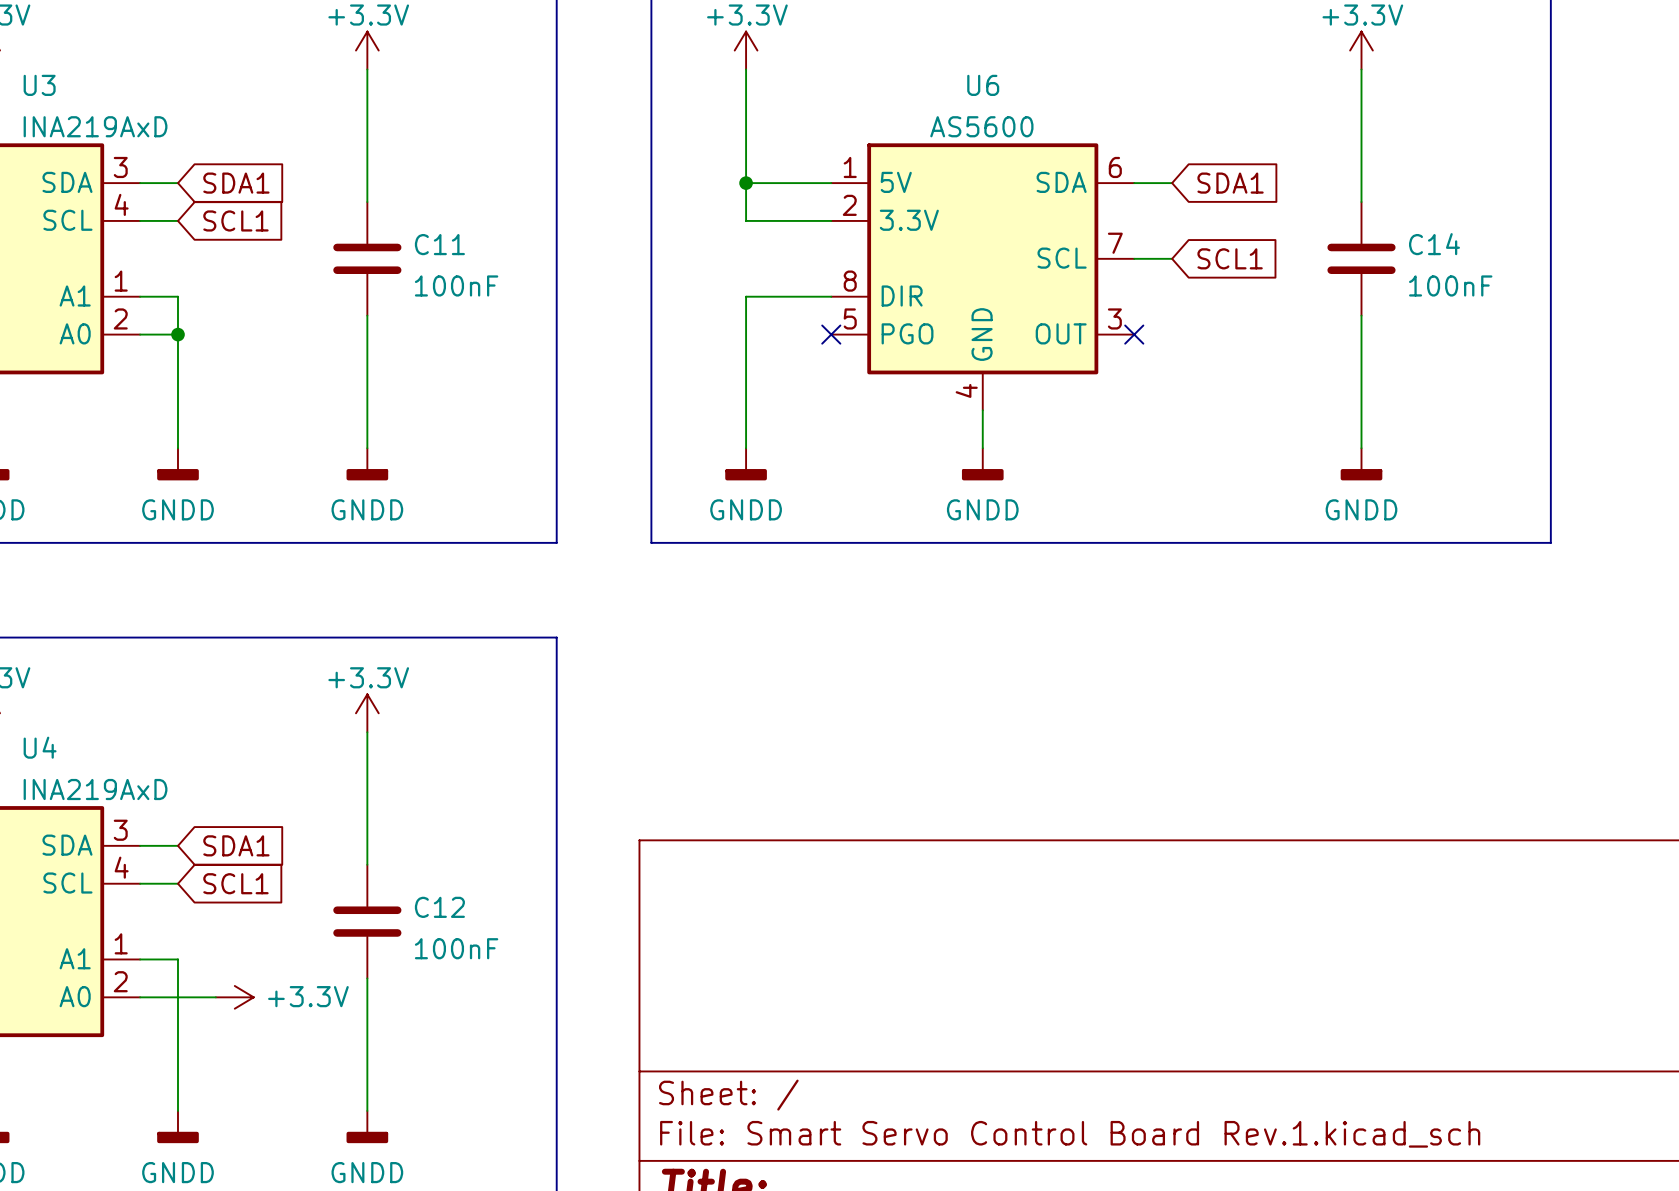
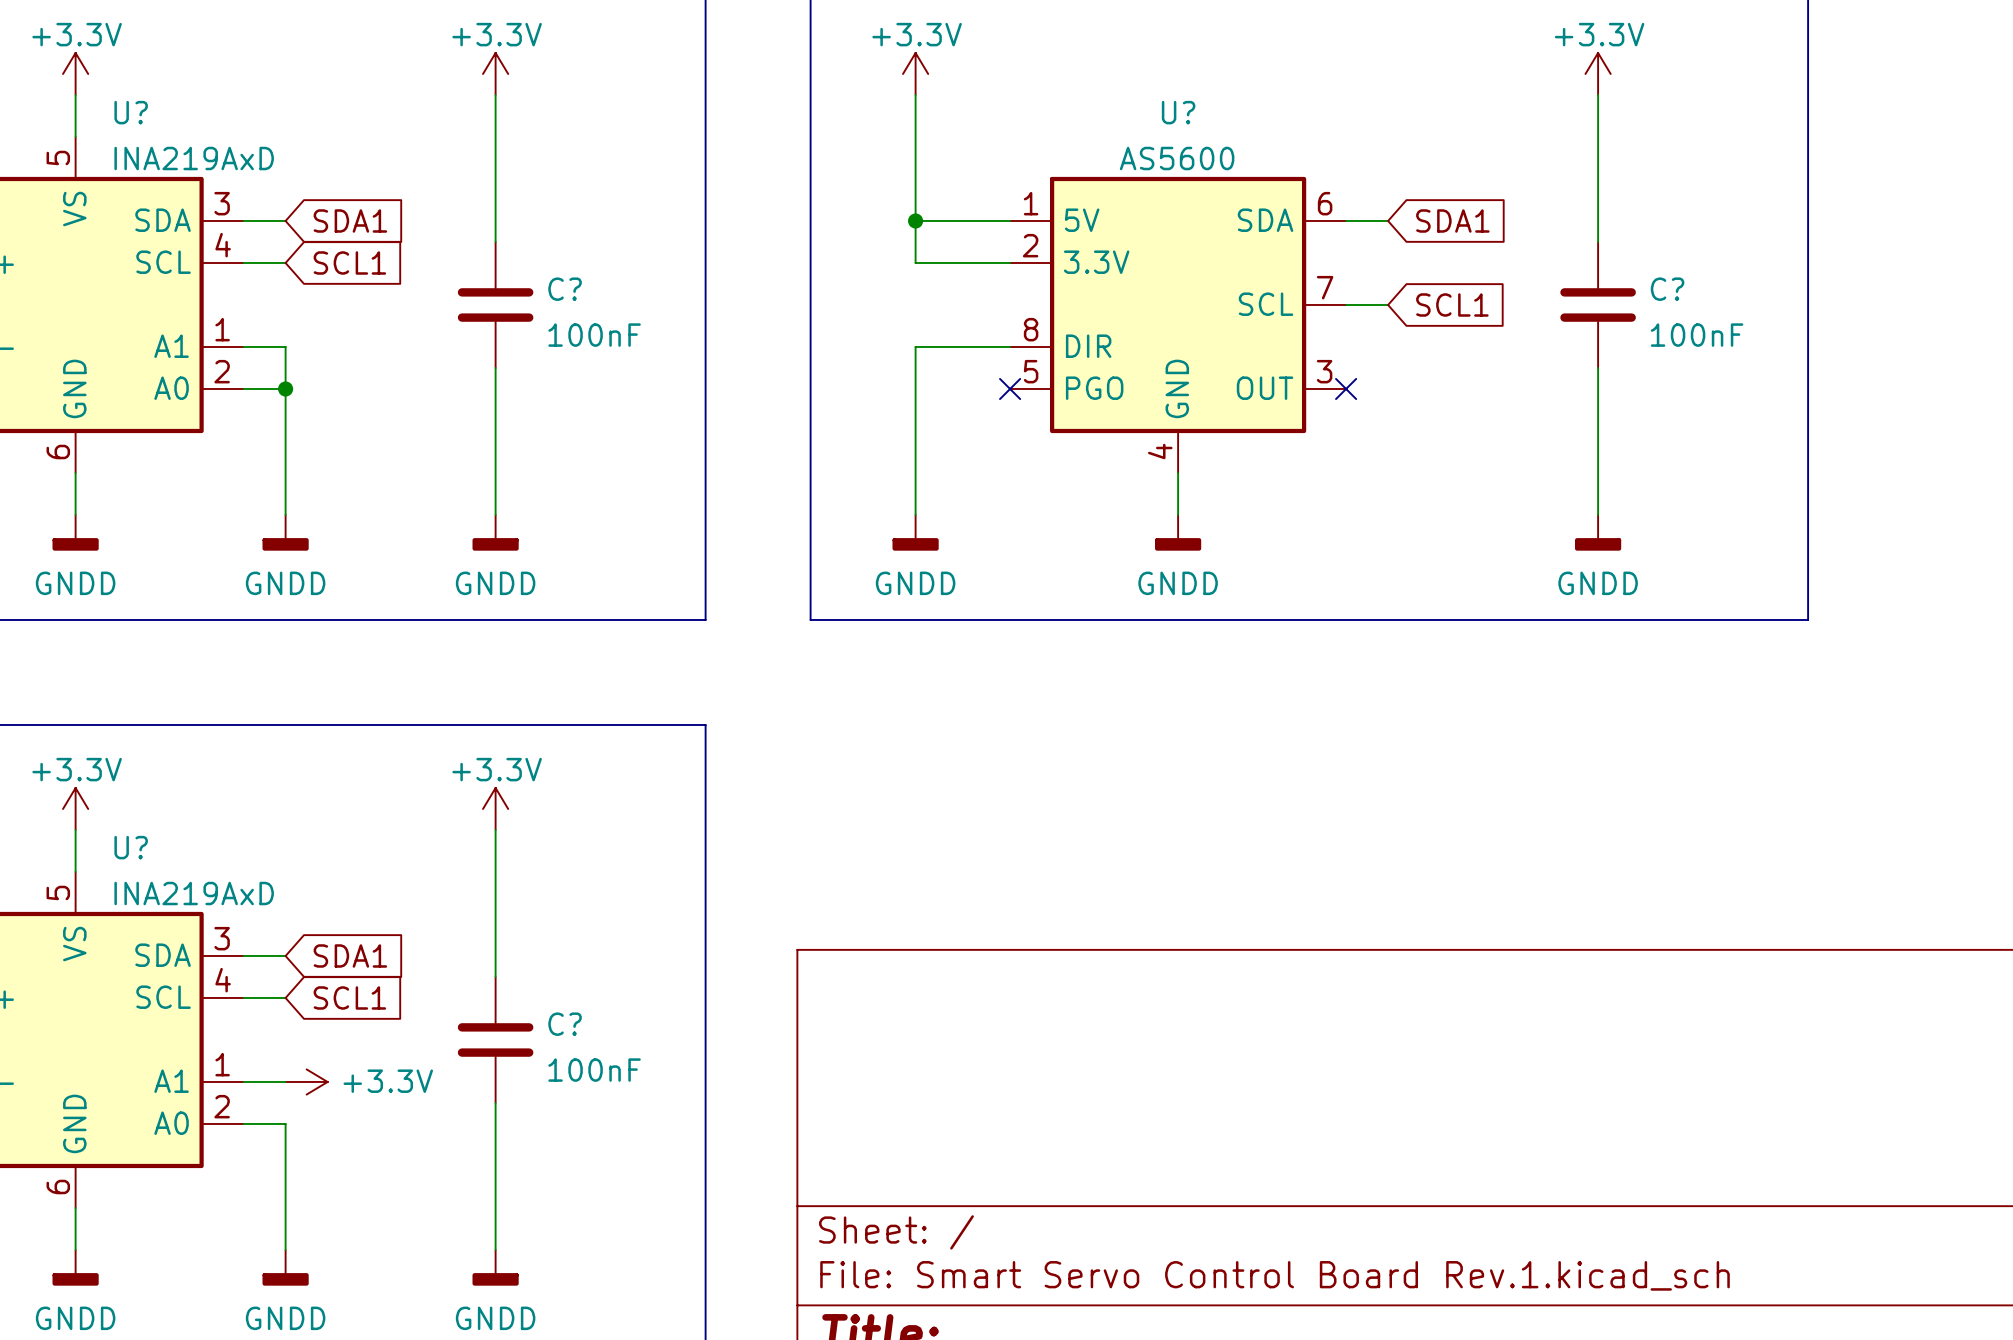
U3 name: U3 (39, 85) -> U? (131, 112)
U6 name: U6 (983, 85) -> U? (1178, 112)
C11 name: C11 (439, 244) -> C? (565, 289)
C14 name: C14 (1434, 244) -> C? (1667, 289)
U4 name: U4 (40, 747) -> U? (131, 847)
C12 name: C12 (439, 907) -> C? (565, 1024)
wire: (177, 959) (177, 997) (215, 997) -> none
power symbol position: +3.3V (234, 997) -> +3.3V (306, 1081)

